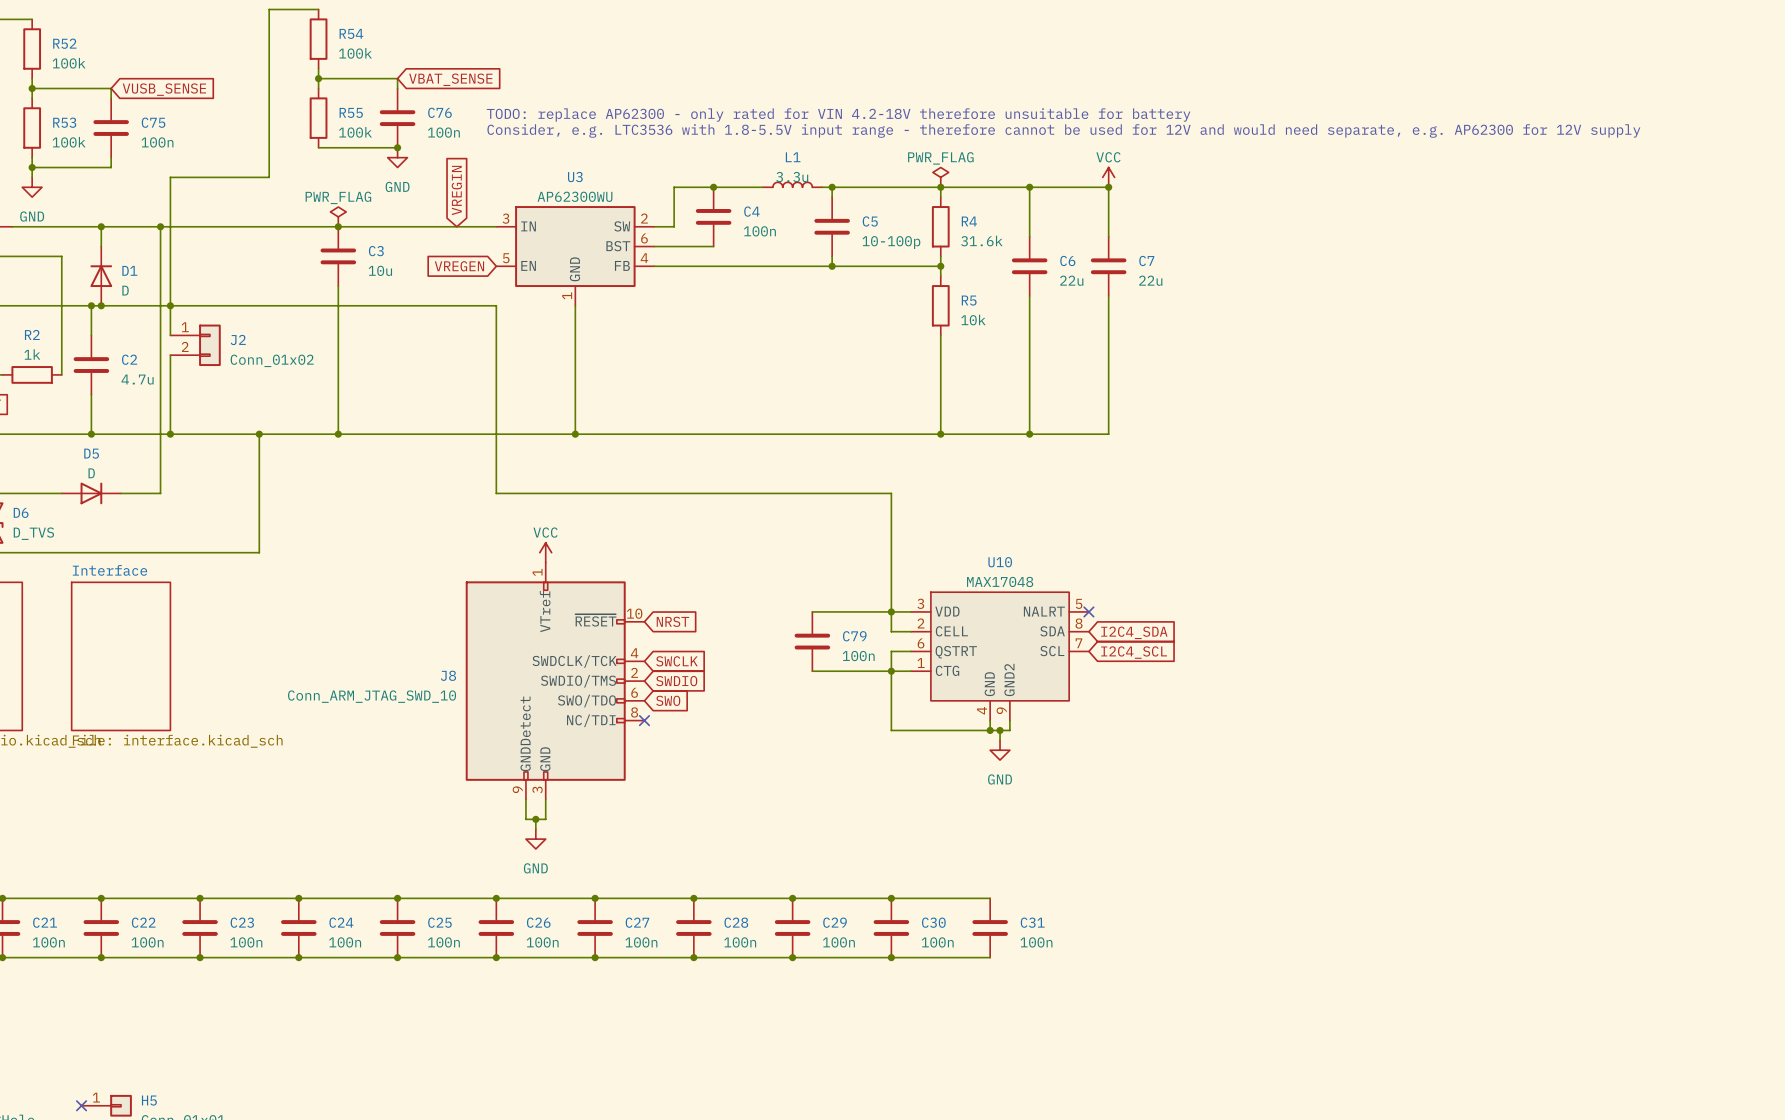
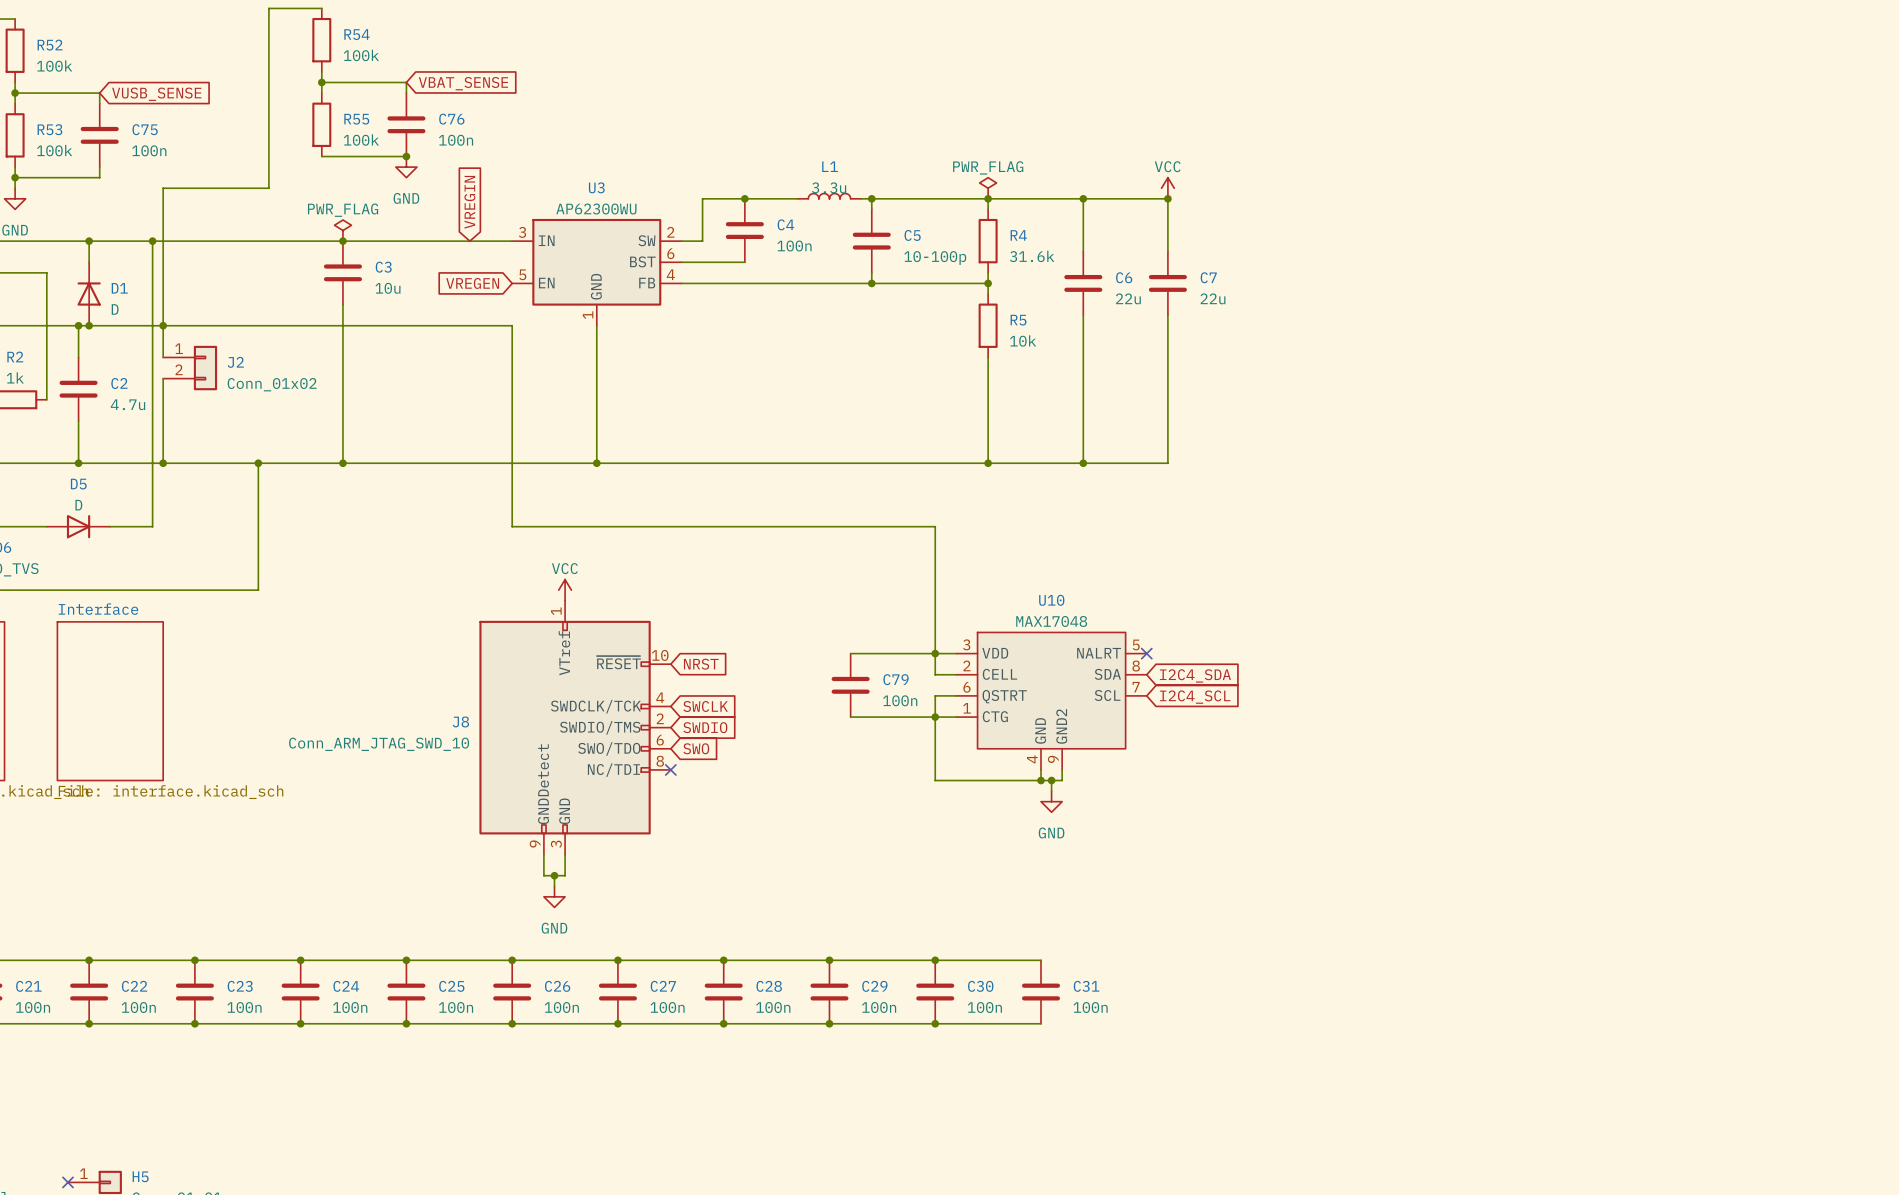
text: TODO: replace AP62300 - only rated for VIN 4.2-18V therefore unsuitable for battery (838, 114) -> none
text: Consider, e.g. LTC3536 with 1.8-5.5V input range - therefore cannot be used for 12V and would need separate, e.g. AP62300 for 12V supply (1063, 130) -> none

